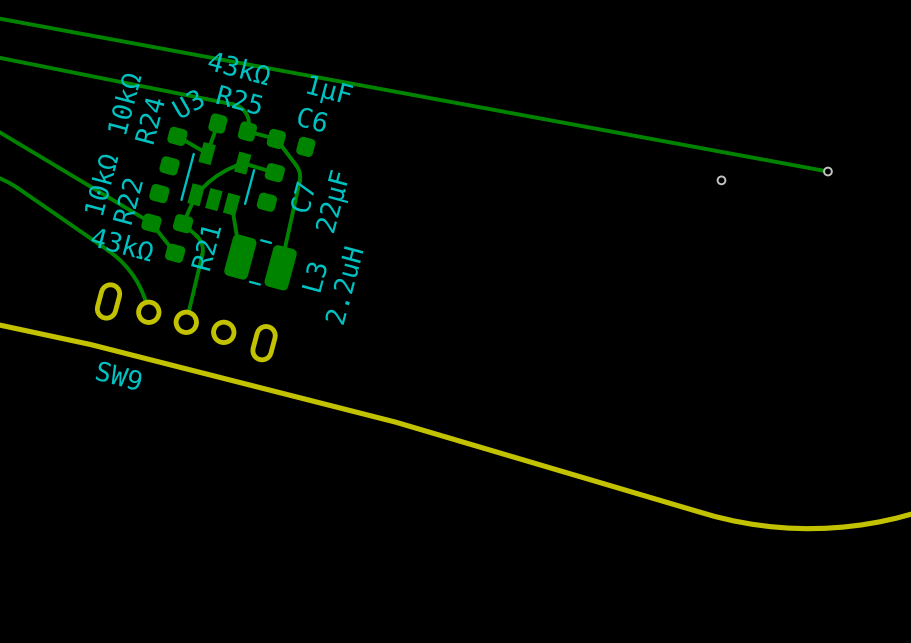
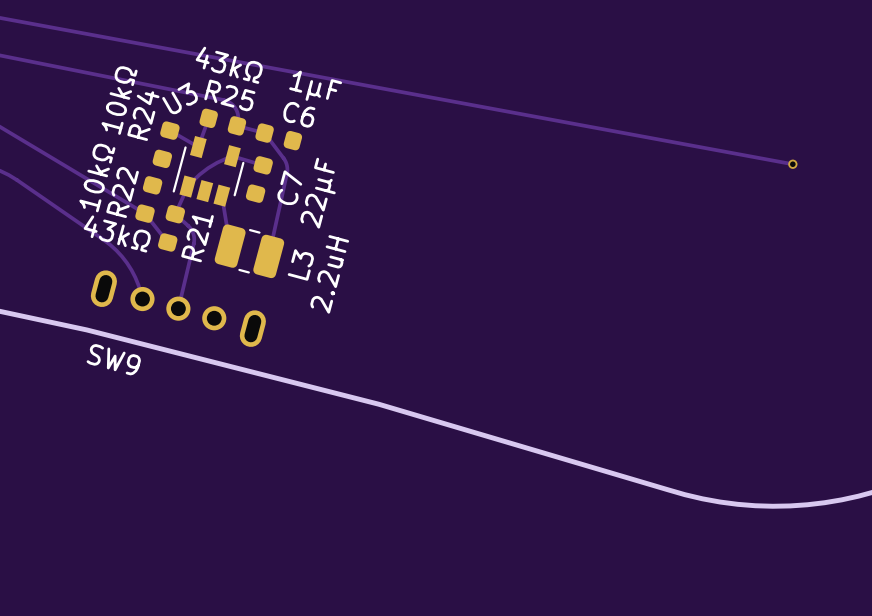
via: (721, 180) -> none

